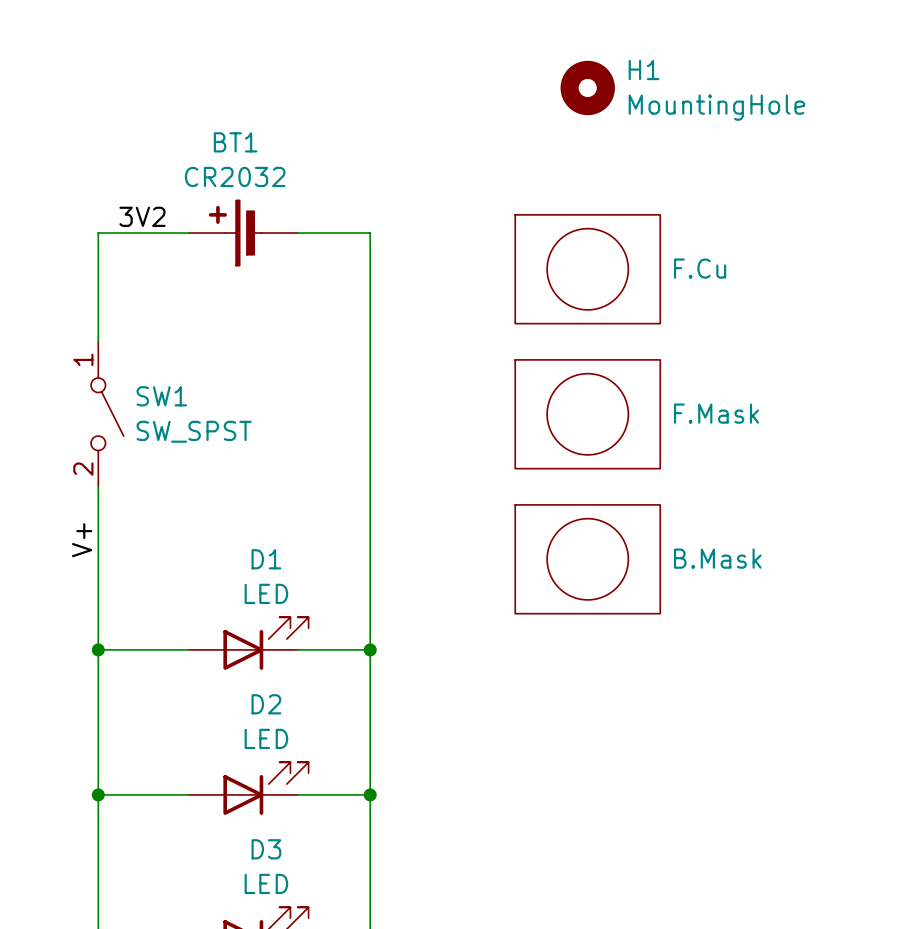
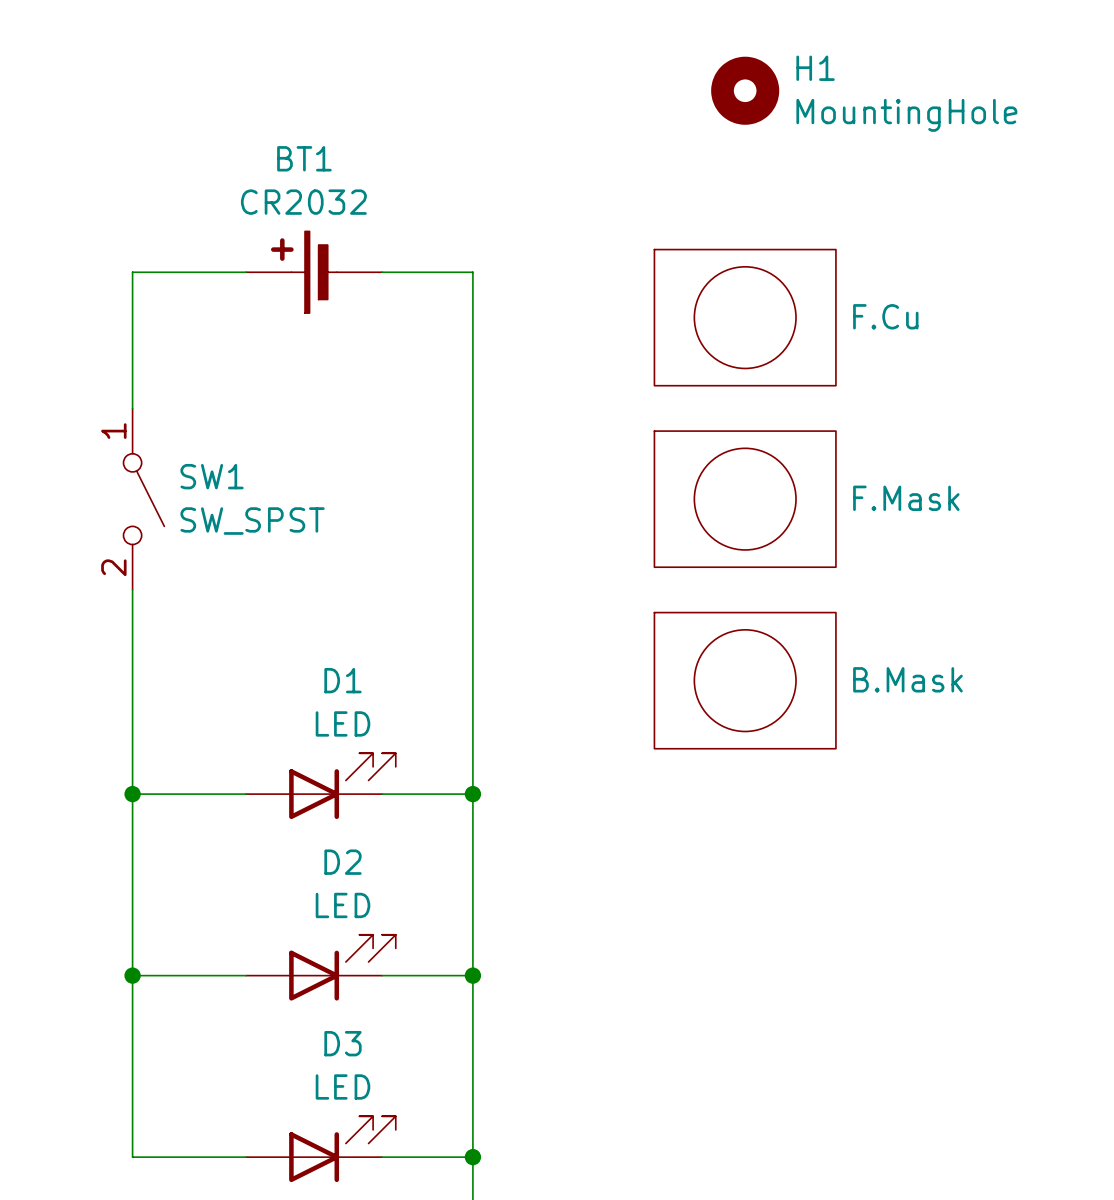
label: 3V2 (142, 216) -> none
label: V+ (82, 540) -> none

